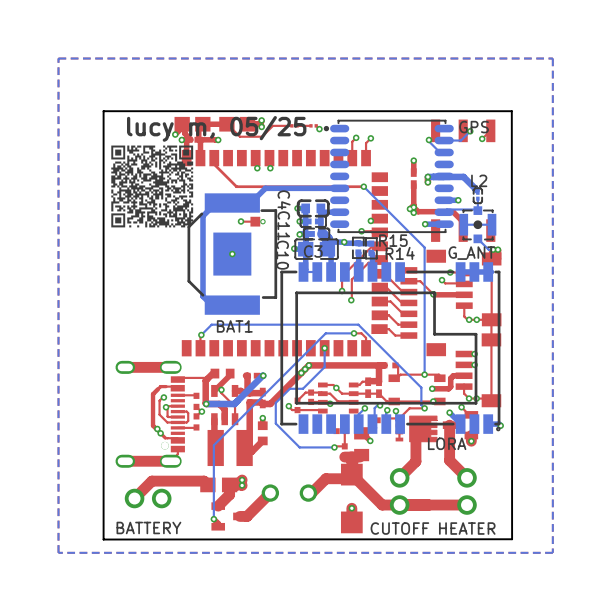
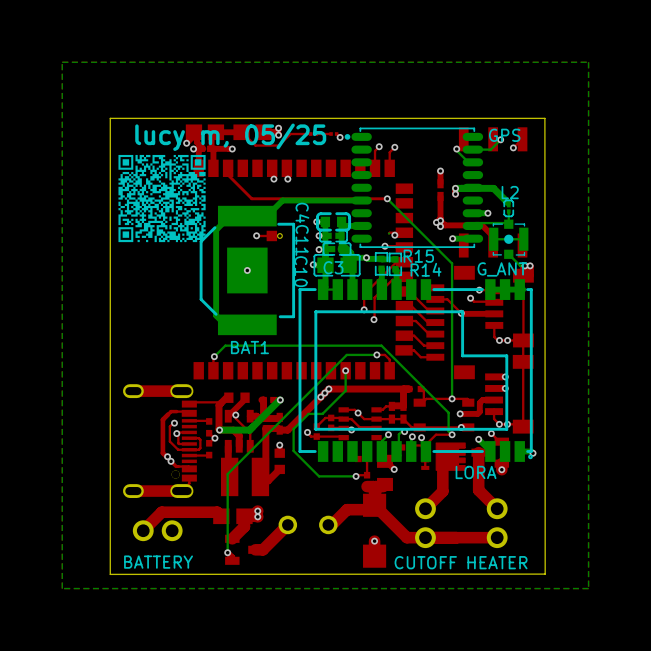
top track: none -> (396, 232) (389, 233)

